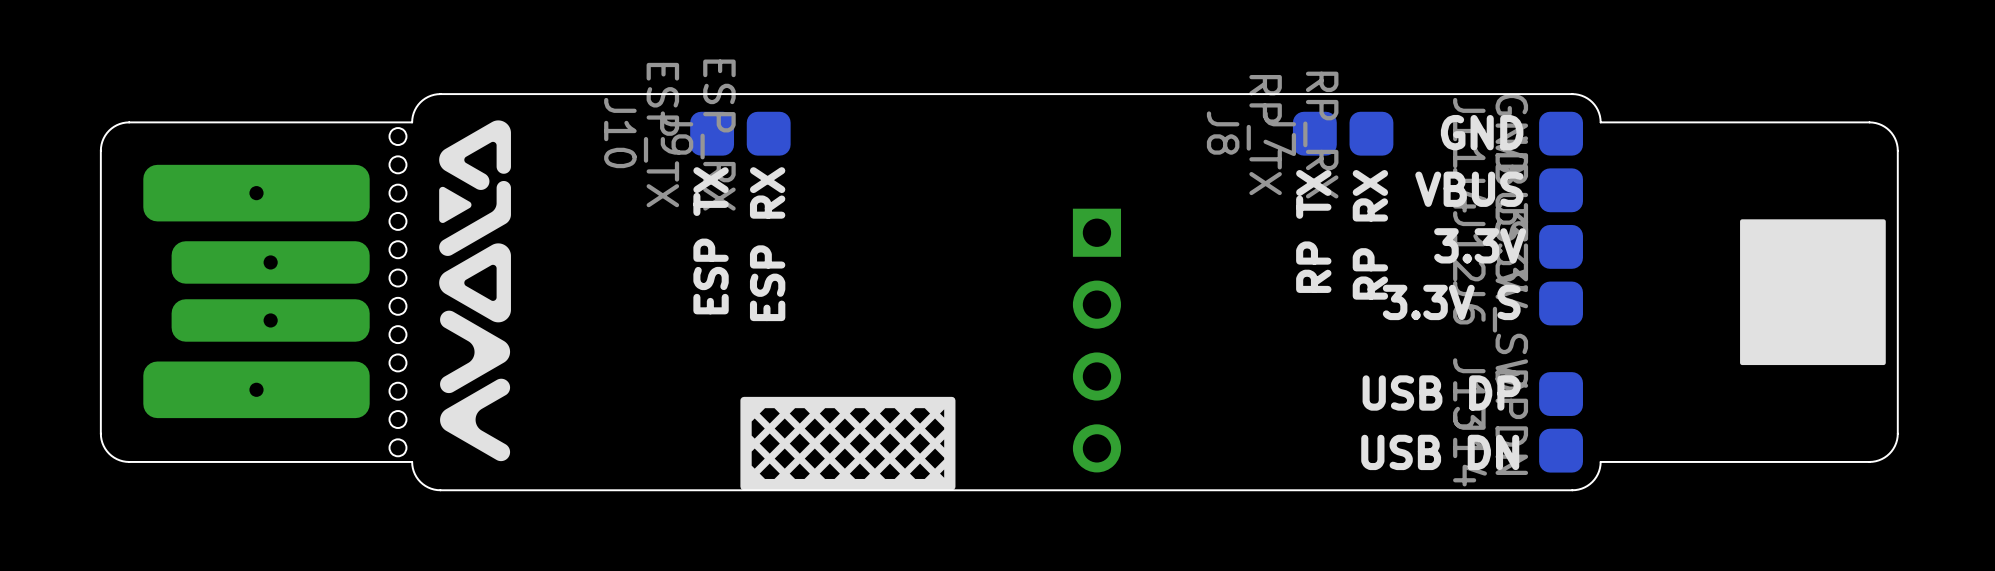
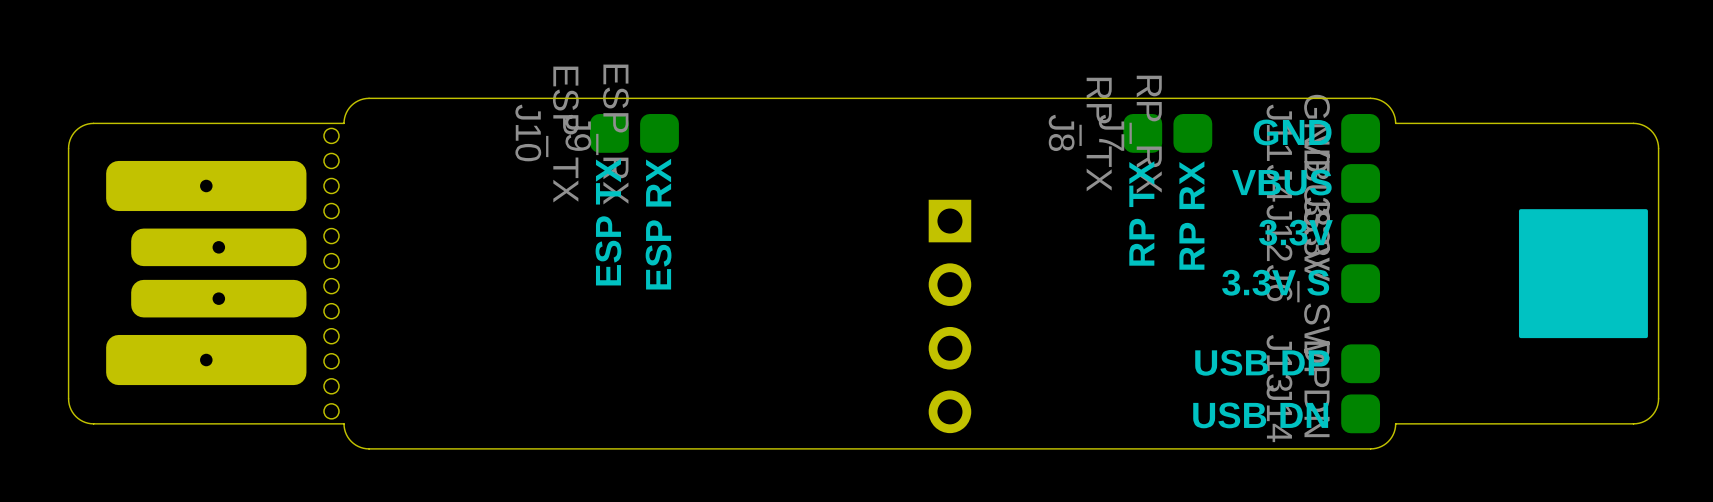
drawing: [439, 120, 511, 462] -> none
drawing: [740, 396, 956, 491] -> none

